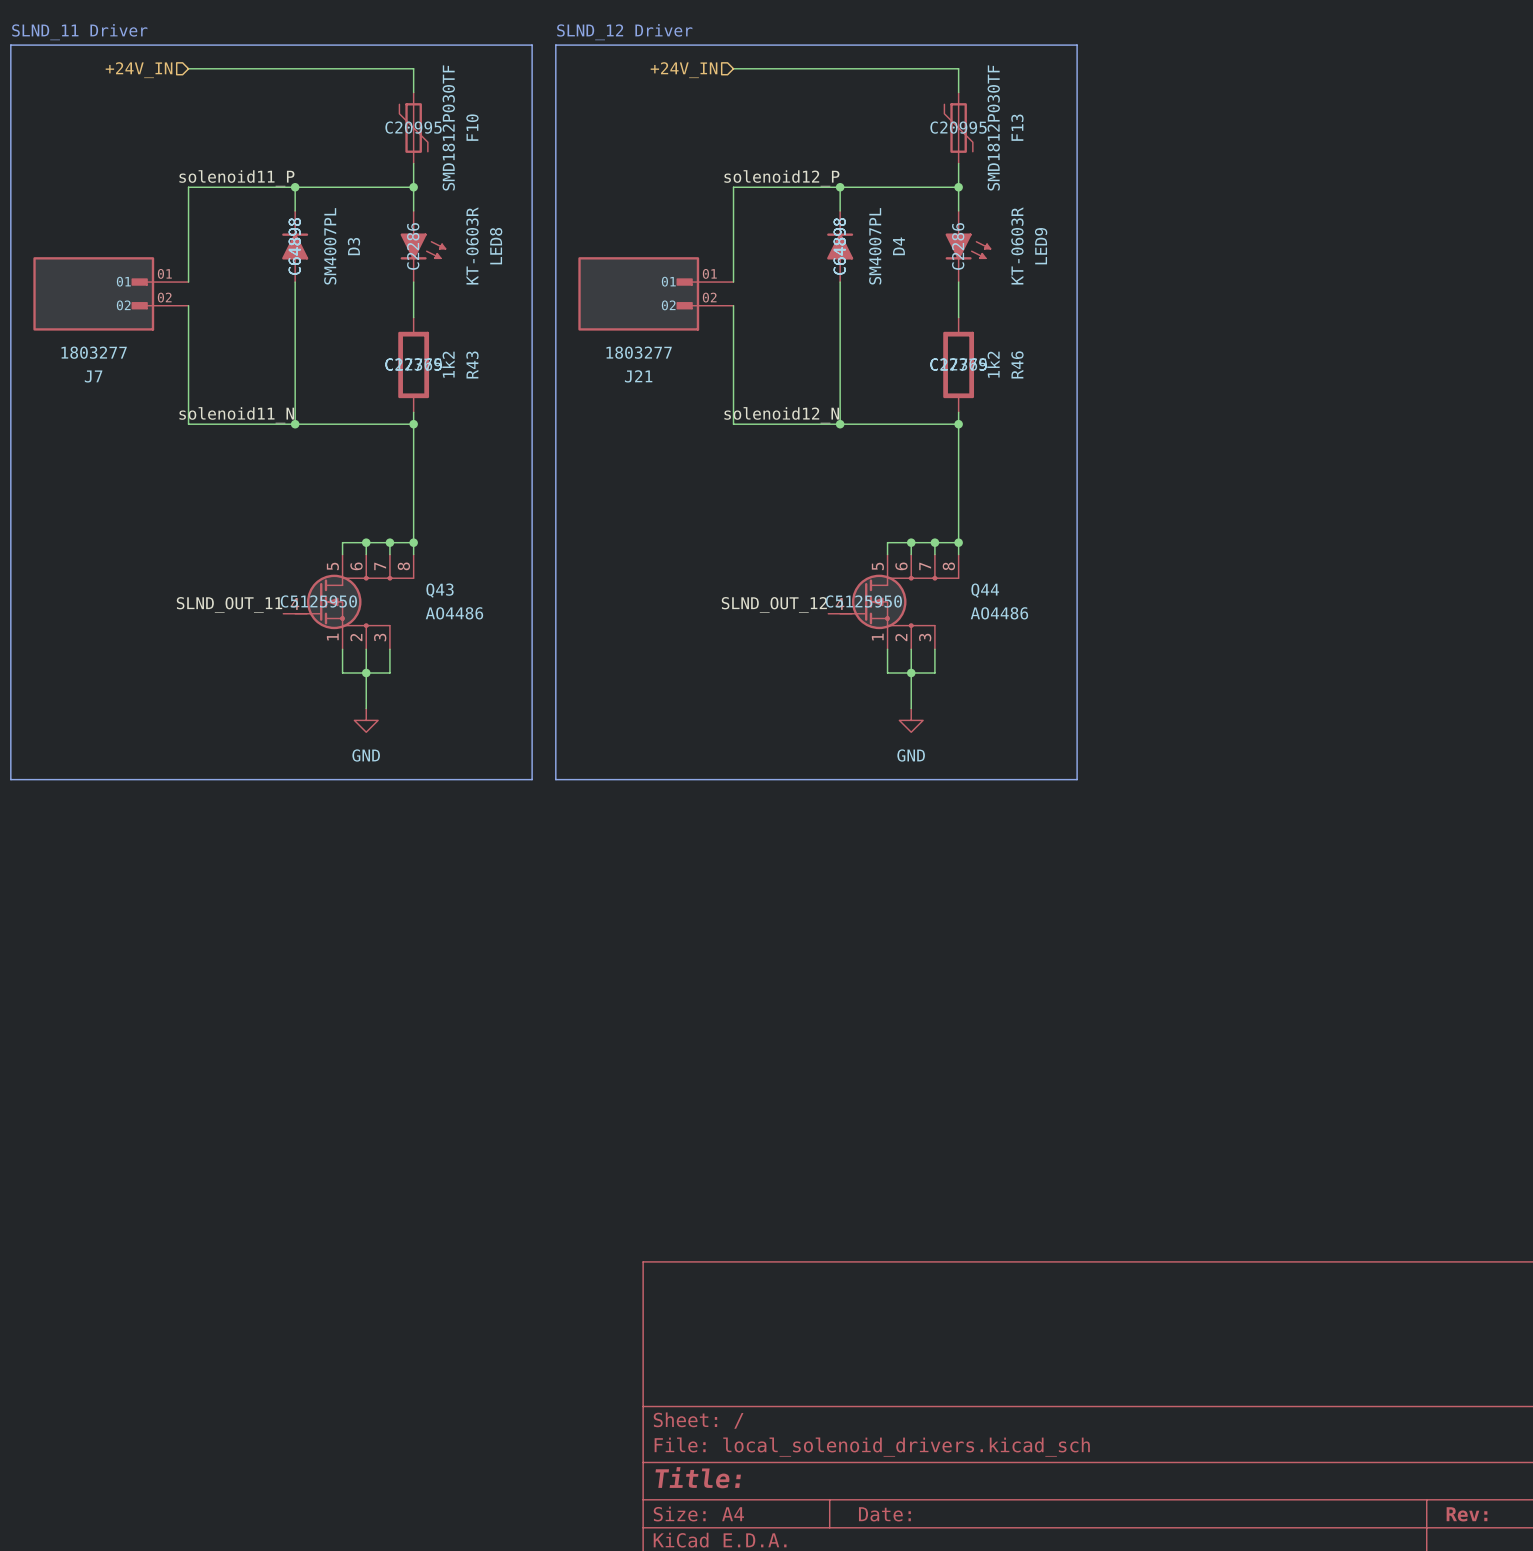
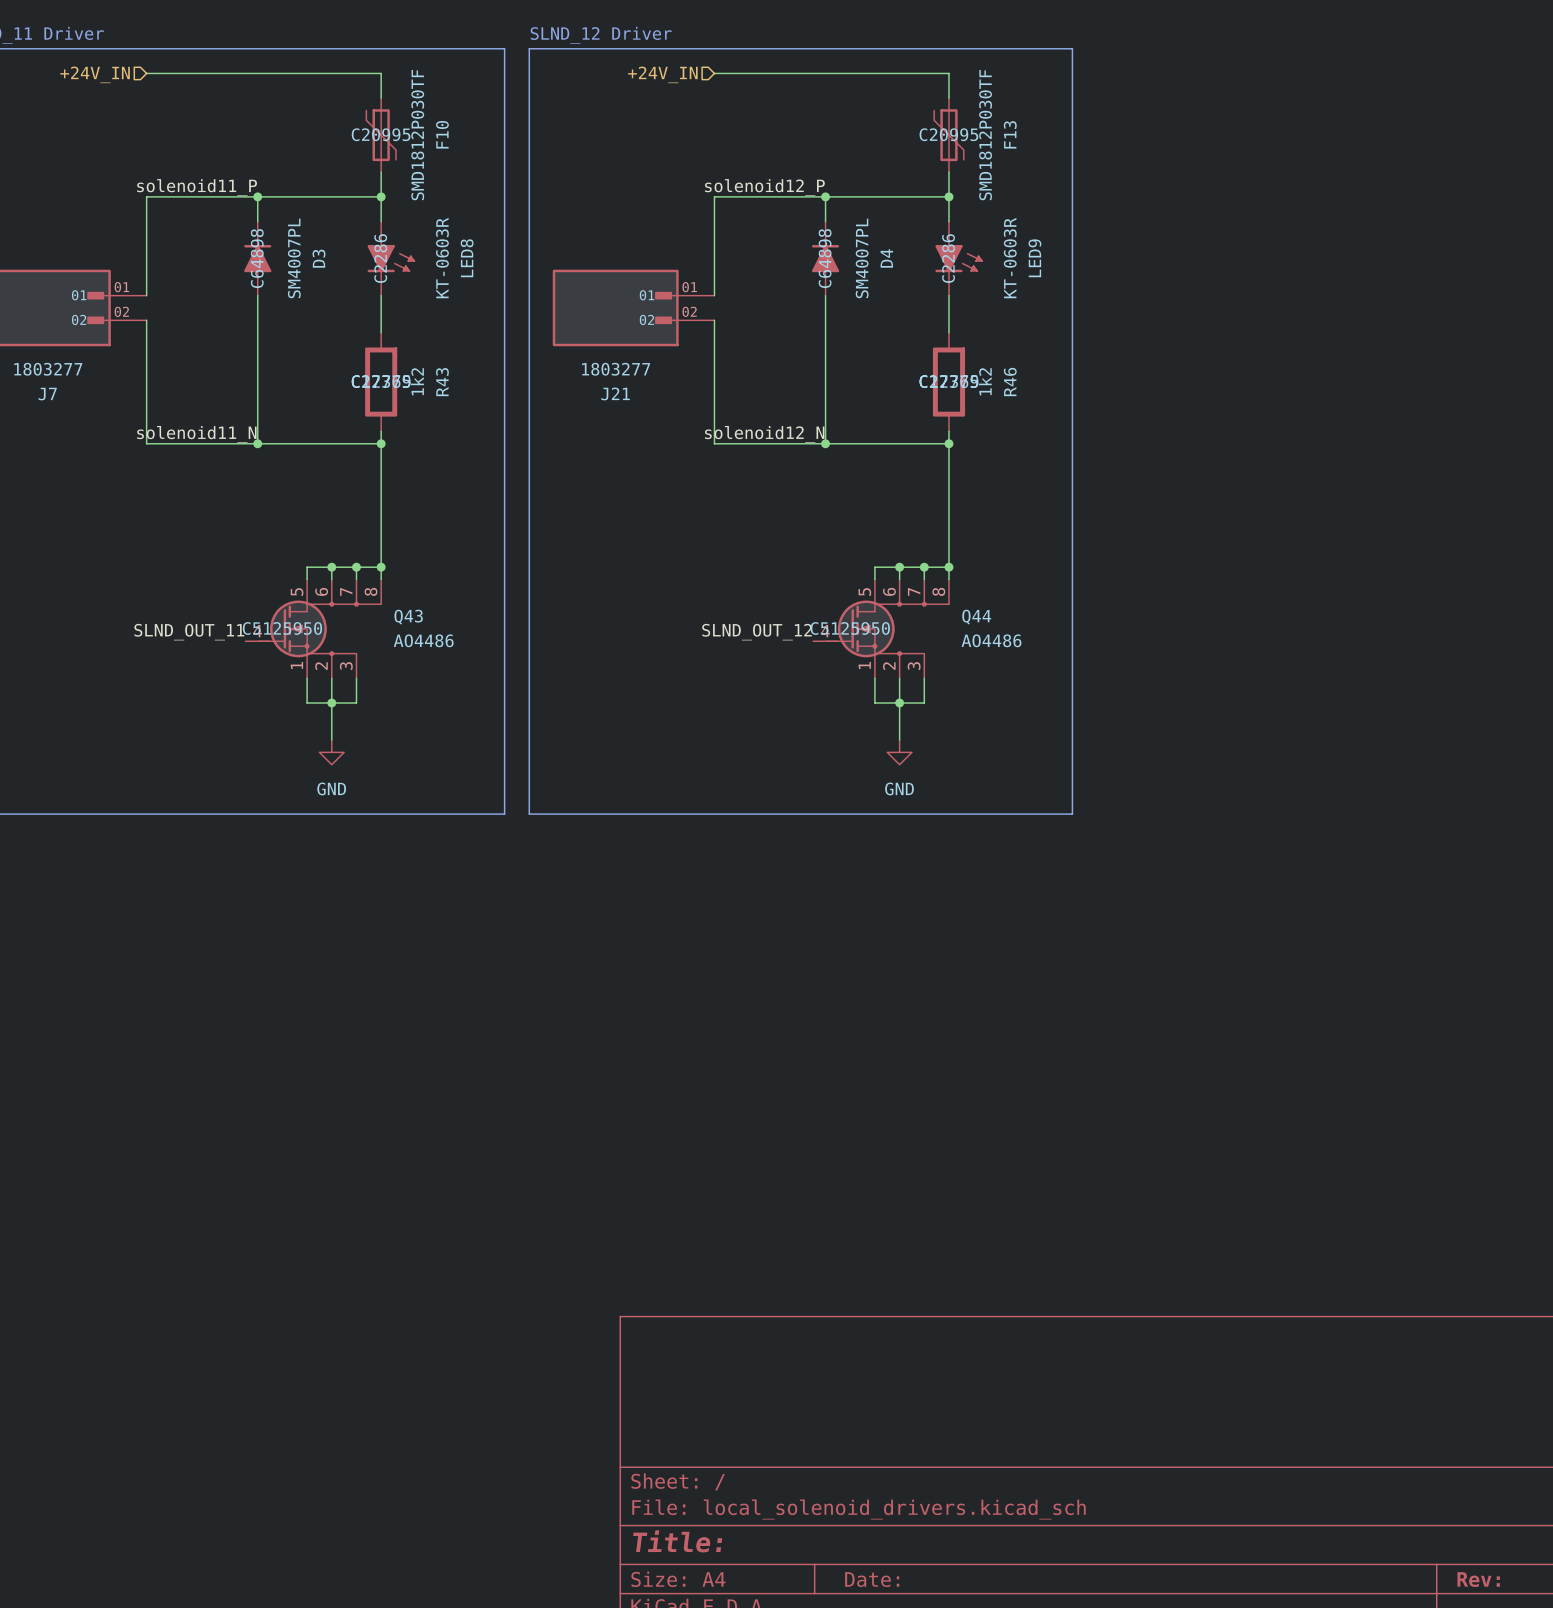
D3 text: C64898 (294, 246) -> none
D4 text: C64898 (839, 246) -> none

